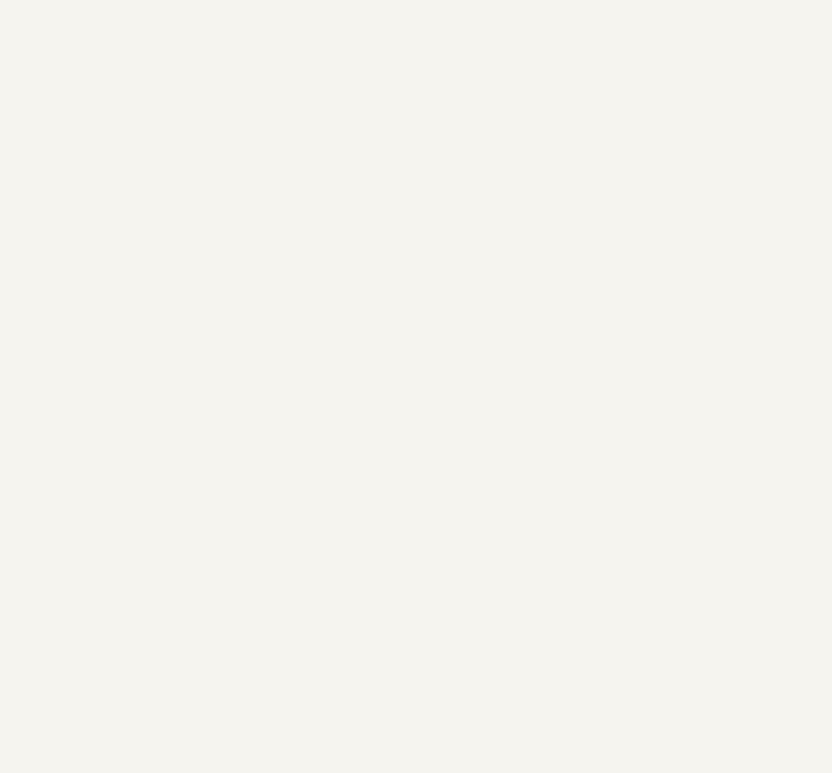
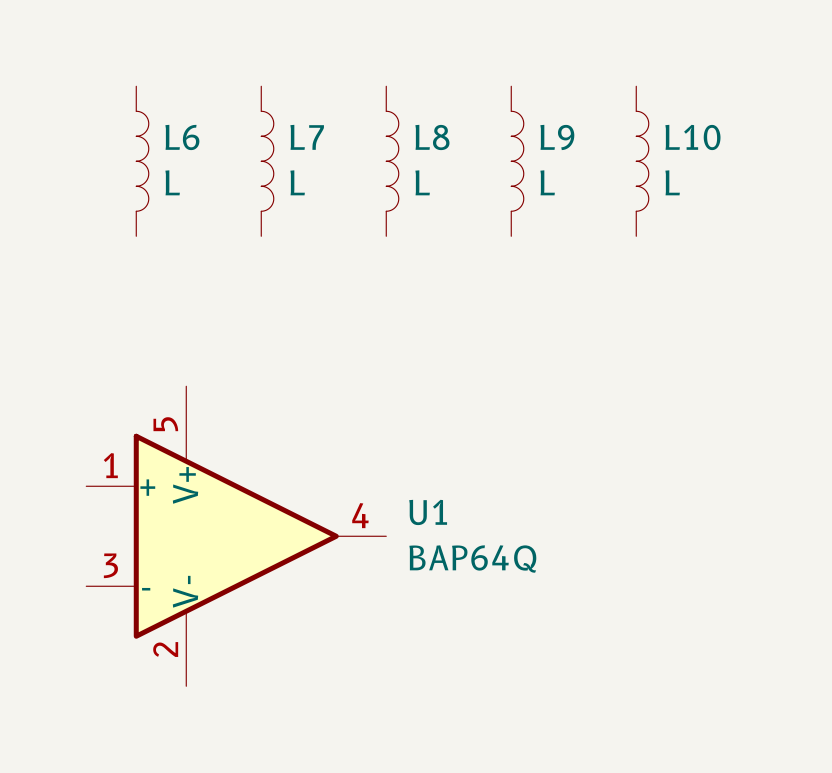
L6: none -> L (142, 161)
L7: none -> L (267, 161)
L8: none -> L (392, 161)
L9: none -> L (517, 161)
L10: none -> L (642, 161)
U1: none -> BAP64Q (236, 536)

